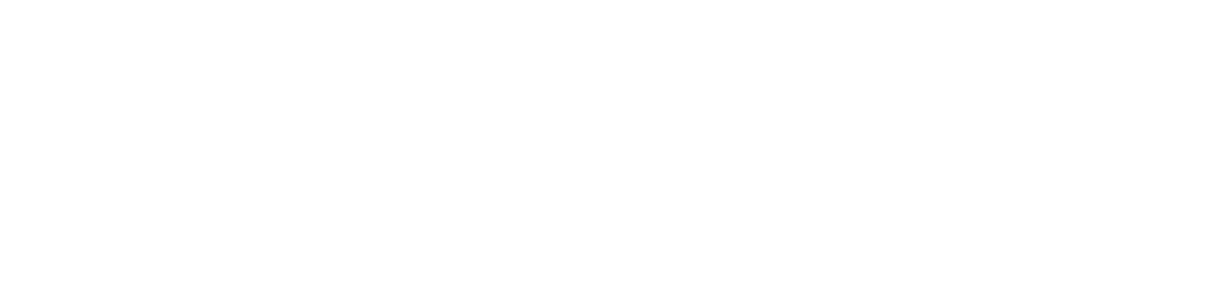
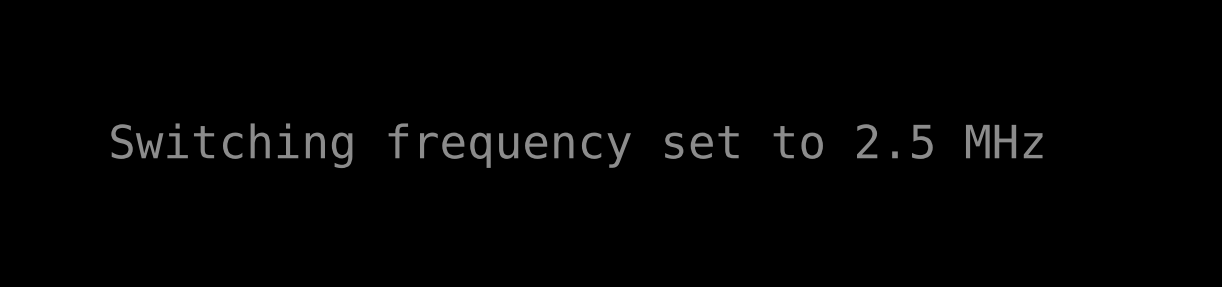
text: none -> Switching frequency set to 2.5 MHz (576, 145)

